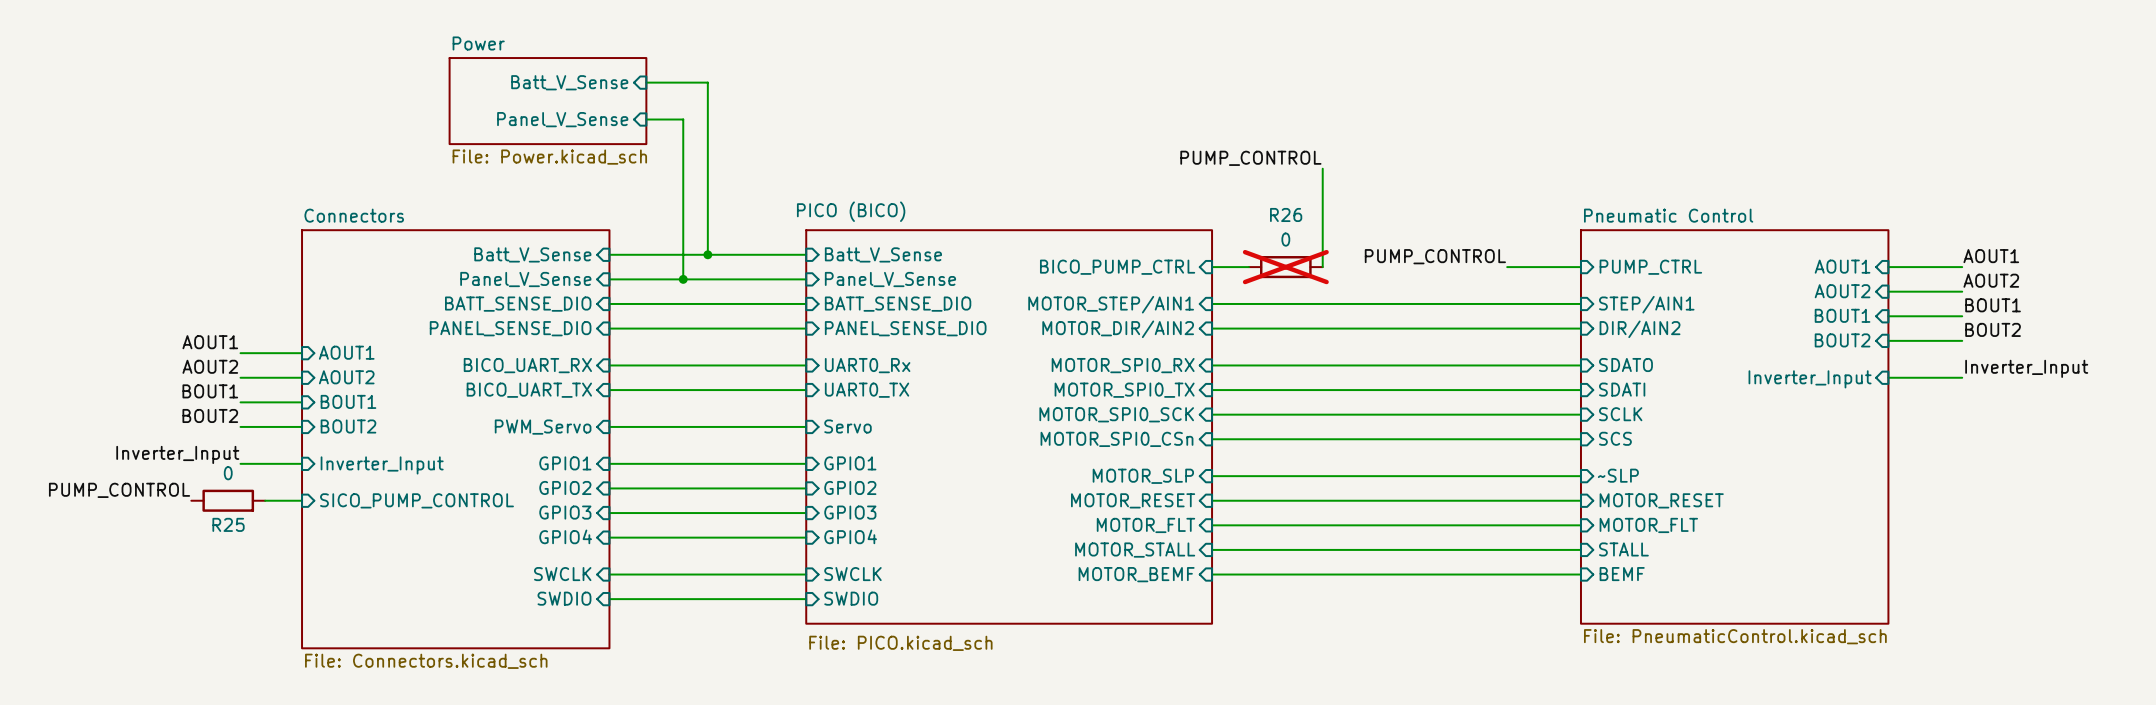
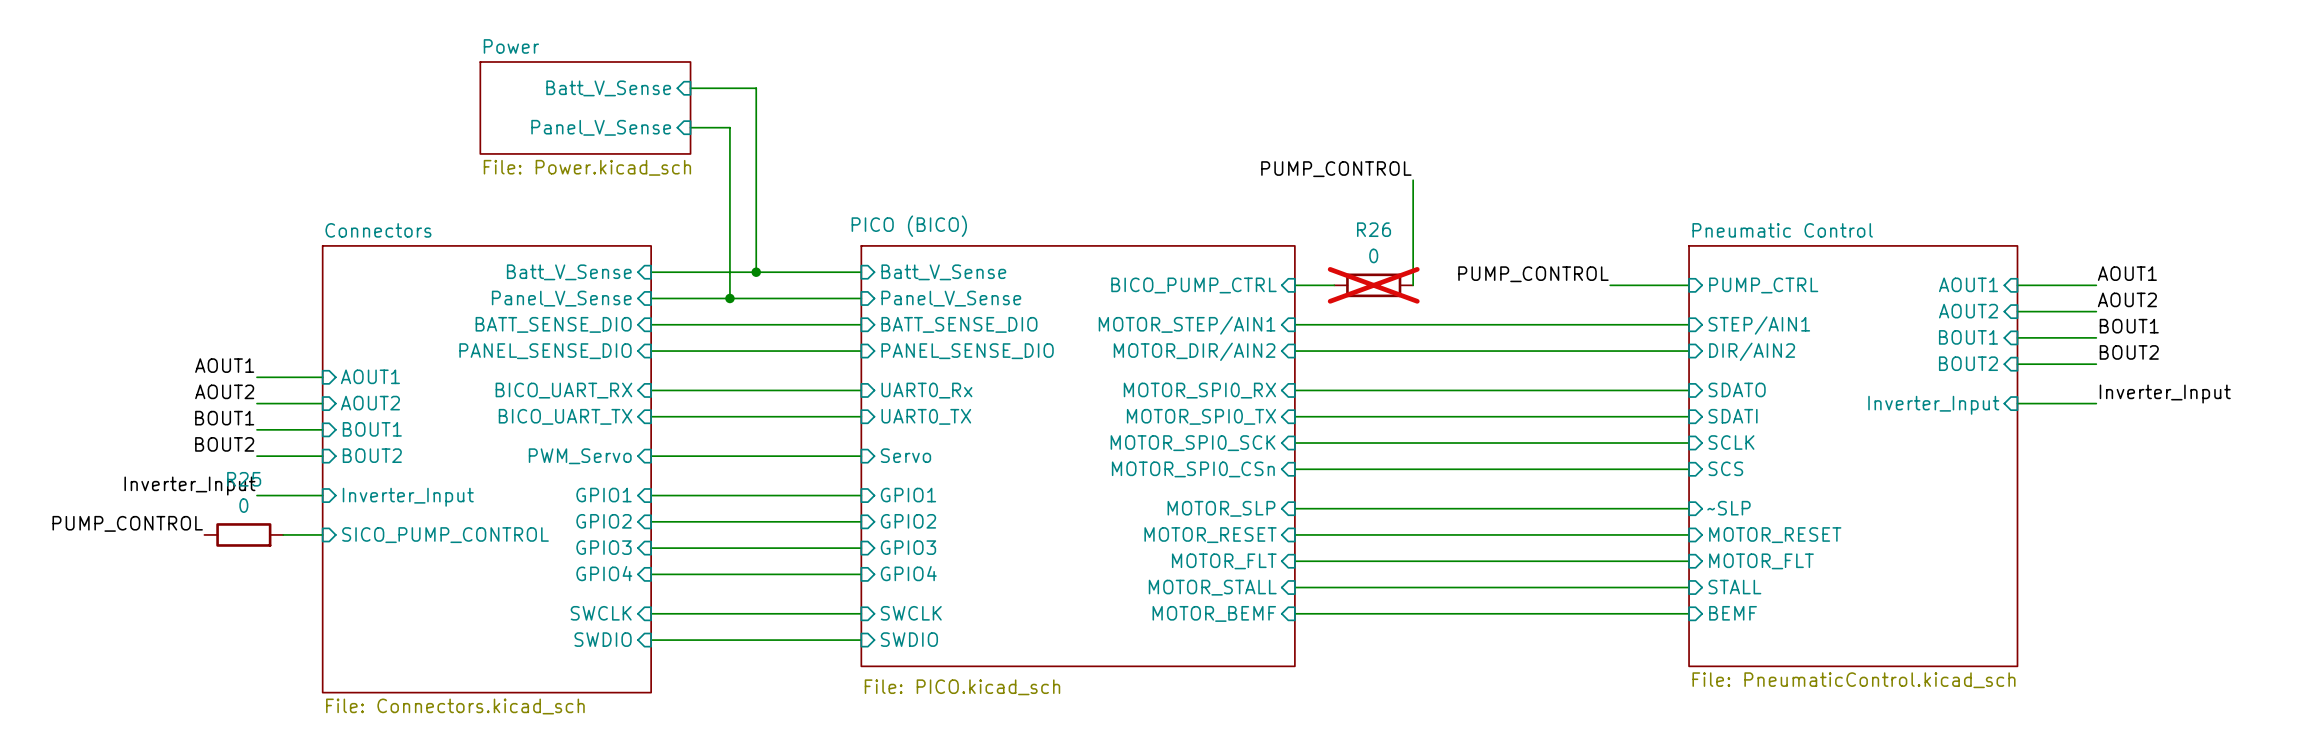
R25 name position: R25 (228, 524) -> R25 (244, 479)

